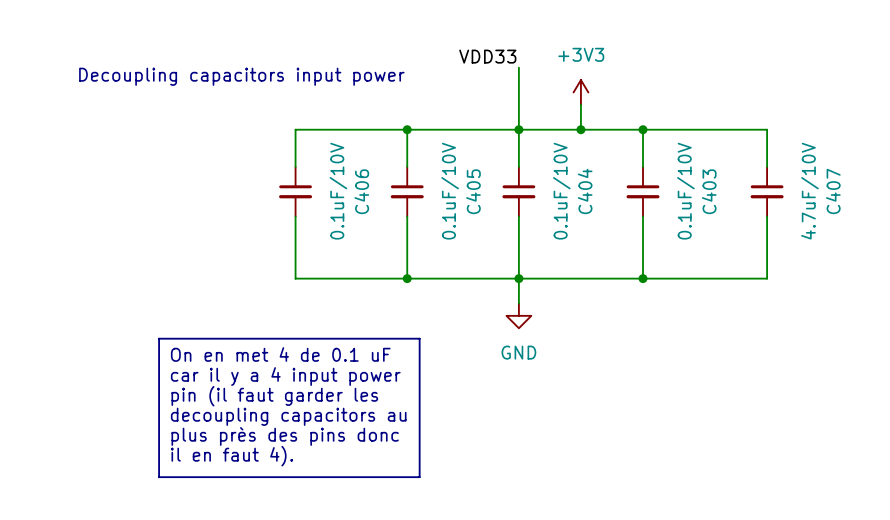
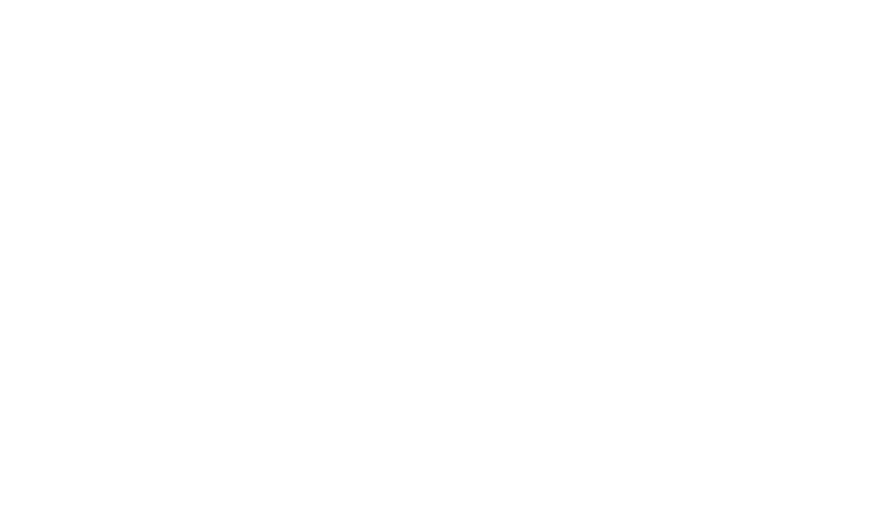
label: VDD33 (487, 56) -> none
wire: (518, 67) (518, 166) -> none
text: Decoupling capacitors input power (241, 76) -> none
power symbol: +3V3 (580, 92) -> none
wire: (580, 104) (580, 129) -> none
wire: (407, 129) (407, 166) -> none
junction: (407, 129) -> none
junction: (518, 129) -> none
junction: (580, 129) -> none
wire: (643, 129) (643, 166) -> none
junction: (643, 129) -> none
wire: (295, 166) (295, 129) (767, 129) (767, 166) -> none
C406: 0.1uF/10V (295, 191) -> none
C405: 0.1uF/10V (407, 191) -> none
C404: 0.1uF/10V (518, 191) -> none
C403: 0.1uF/10V (643, 191) -> none
C407: 4.7uF/10V (767, 191) -> none
wire: (295, 216) (295, 278) (767, 278) (767, 216) -> none
wire: (407, 216) (407, 278) -> none
wire: (518, 216) (518, 303) -> none
wire: (643, 216) (643, 278) -> none
junction: (407, 278) -> none
junction: (518, 278) -> none
junction: (643, 278) -> none
power symbol: GND (518, 315) -> none
line: (159, 338) (419, 338) (419, 477) (159, 477) (159, 338) -> none
text: On en met 4 de 0.1 uF (280, 354) -> none
text: car il y a 4 input power (285, 376) -> none
text: pin (il faut garder les (274, 396) -> none
text: decoupling capacitors au (288, 416) -> none
text: plus près des pins donc (285, 436) -> none
text: il en faut 4). (231, 456) -> none

